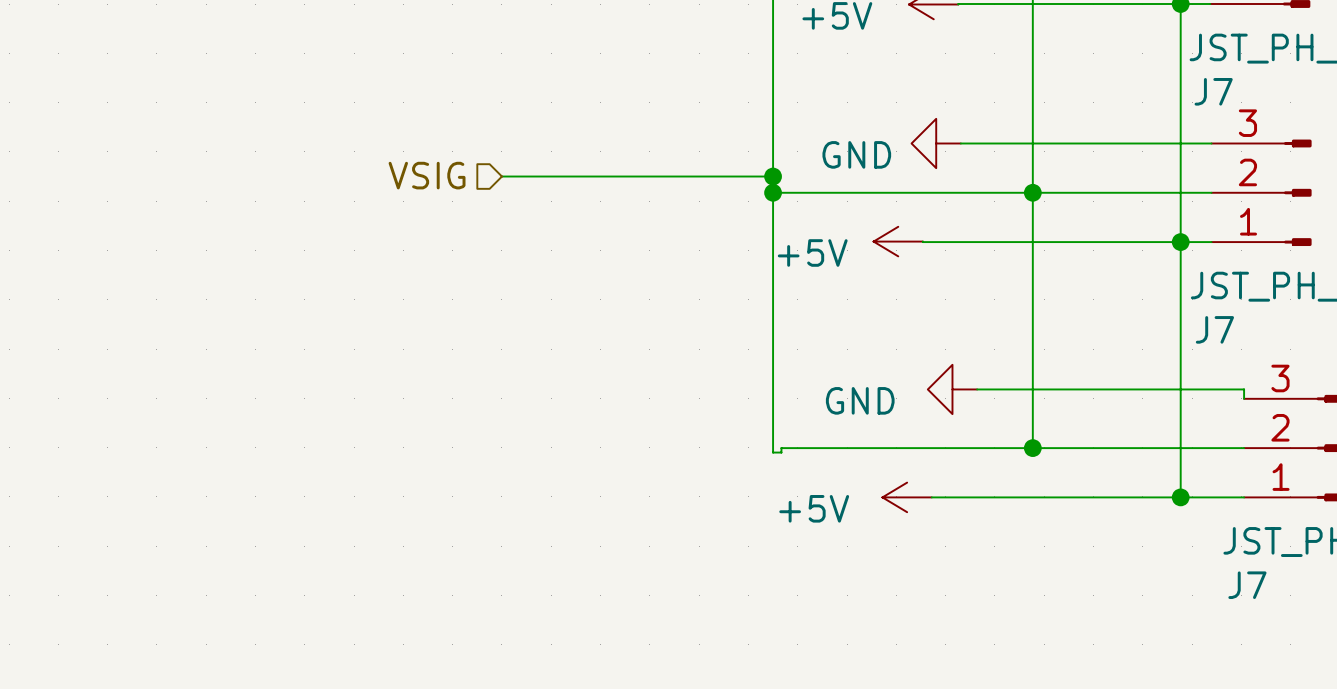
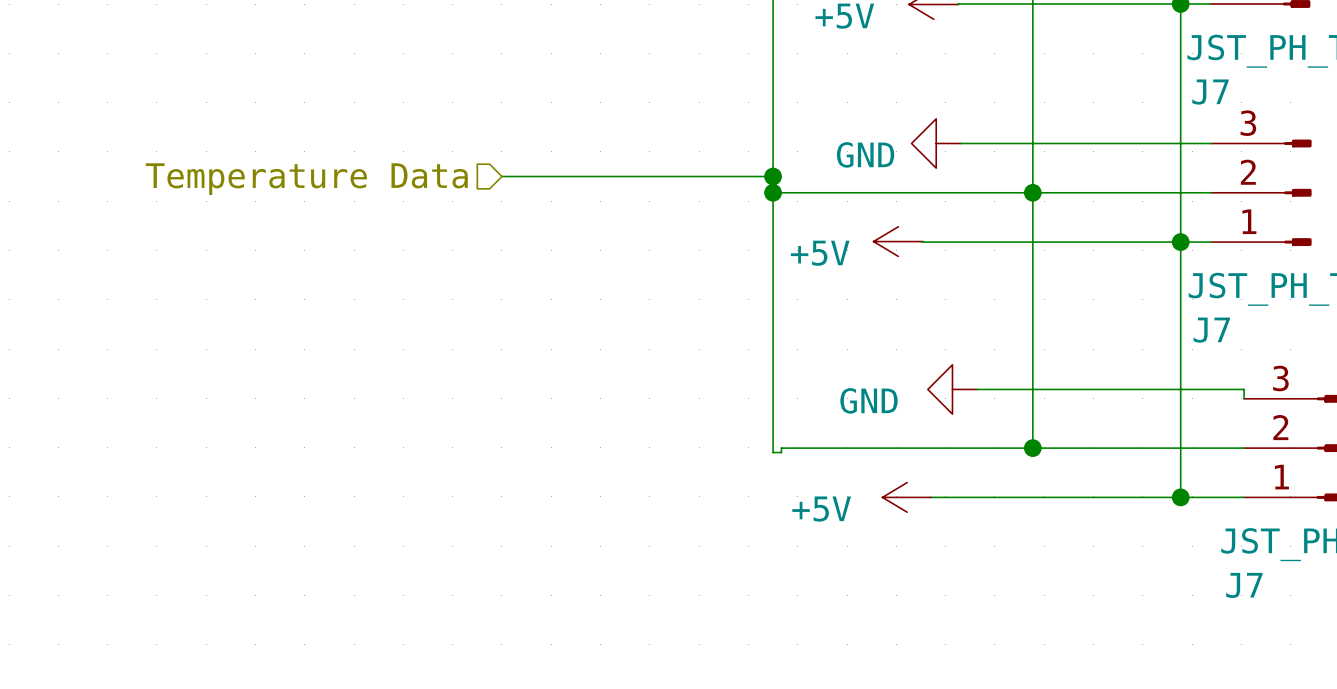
hierarchical label: VSIG (427, 175) -> Temperature Data (306, 179)

